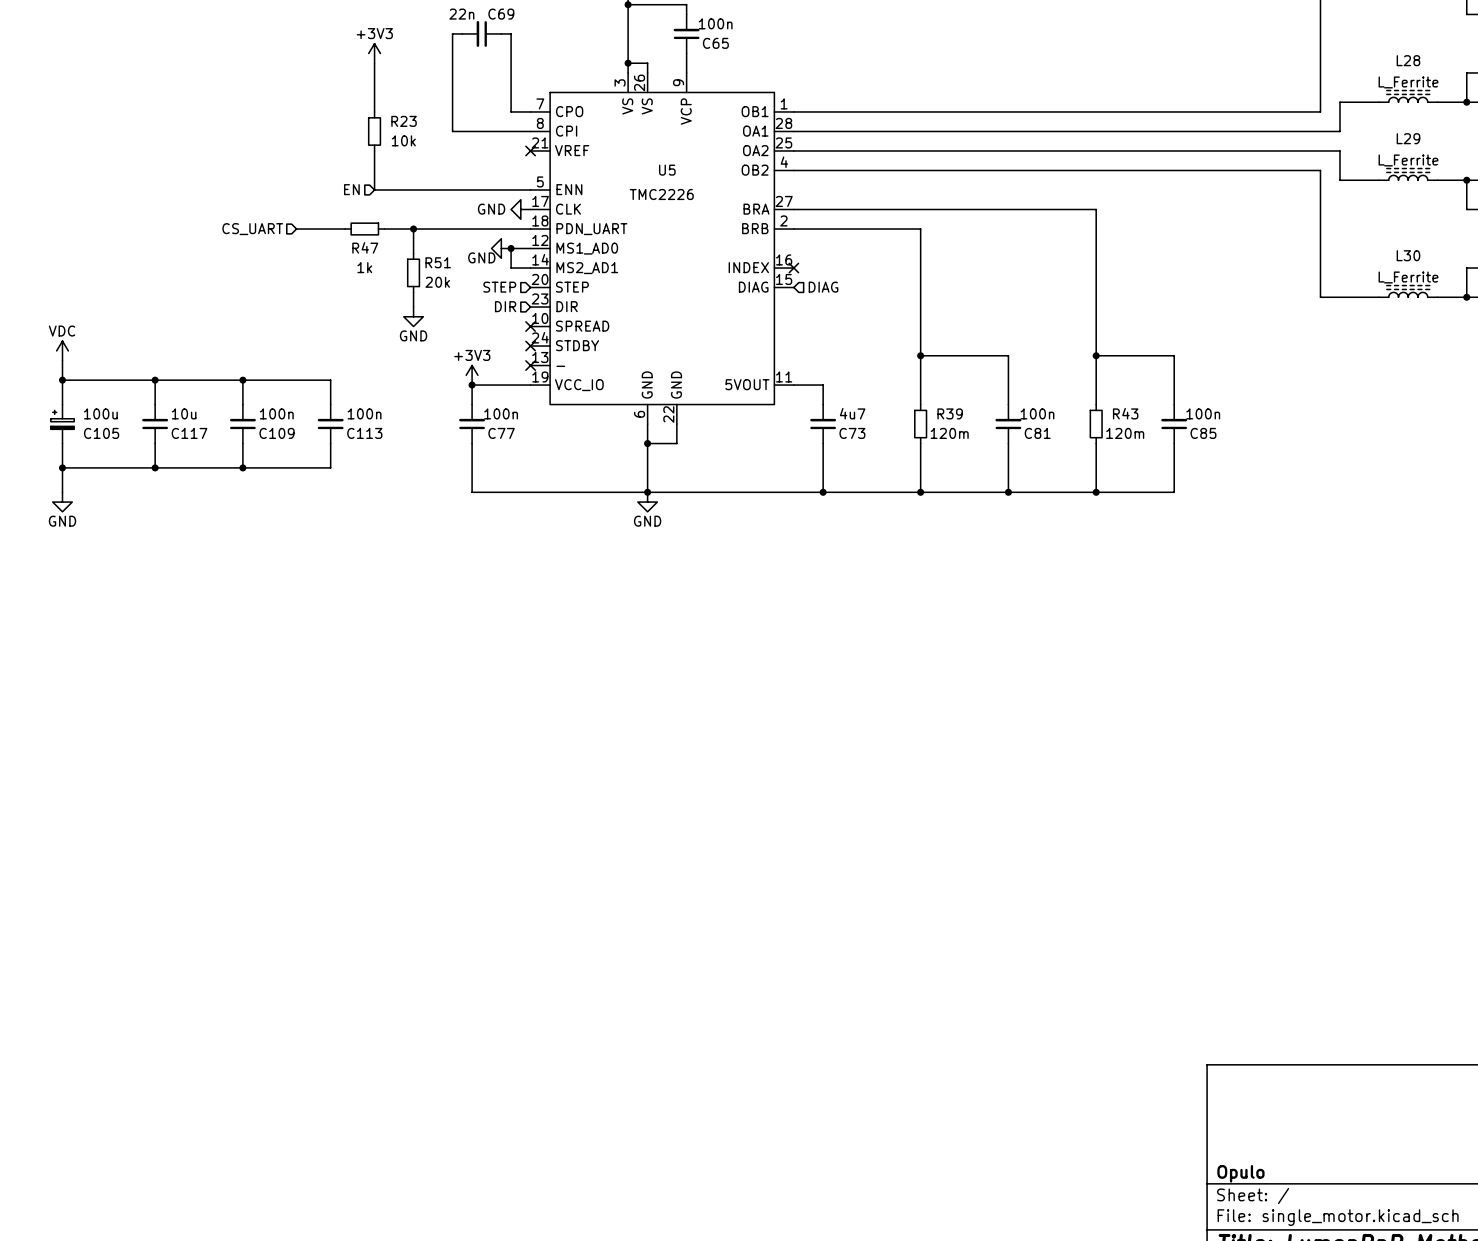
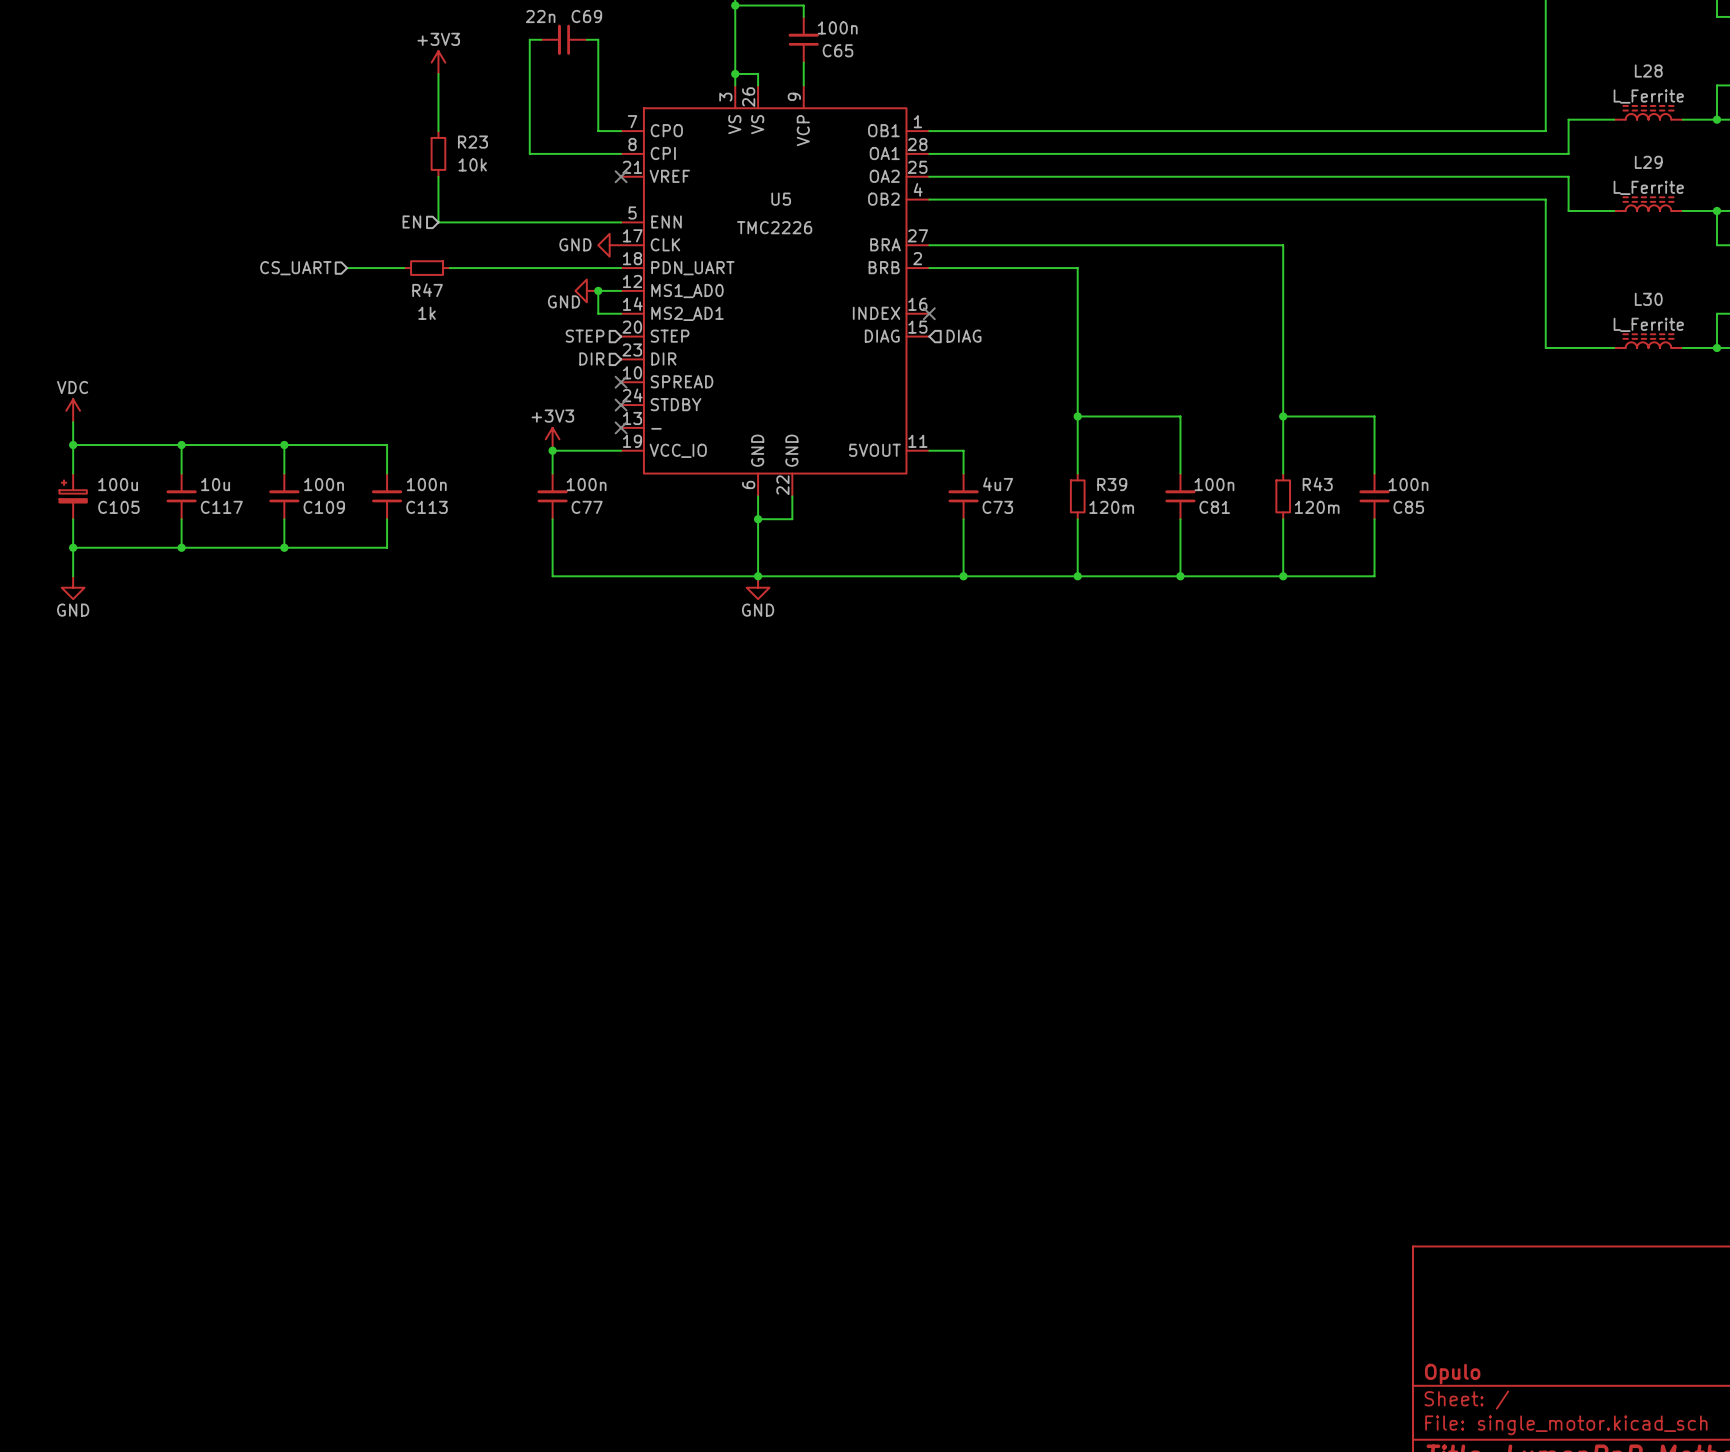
wire: (413, 229) (413, 253) -> none
junction: (413, 229) -> none
R51: 20k (413, 272) -> none
wire: (413, 292) (413, 307) -> none
power symbol: GND (413, 316) -> none

